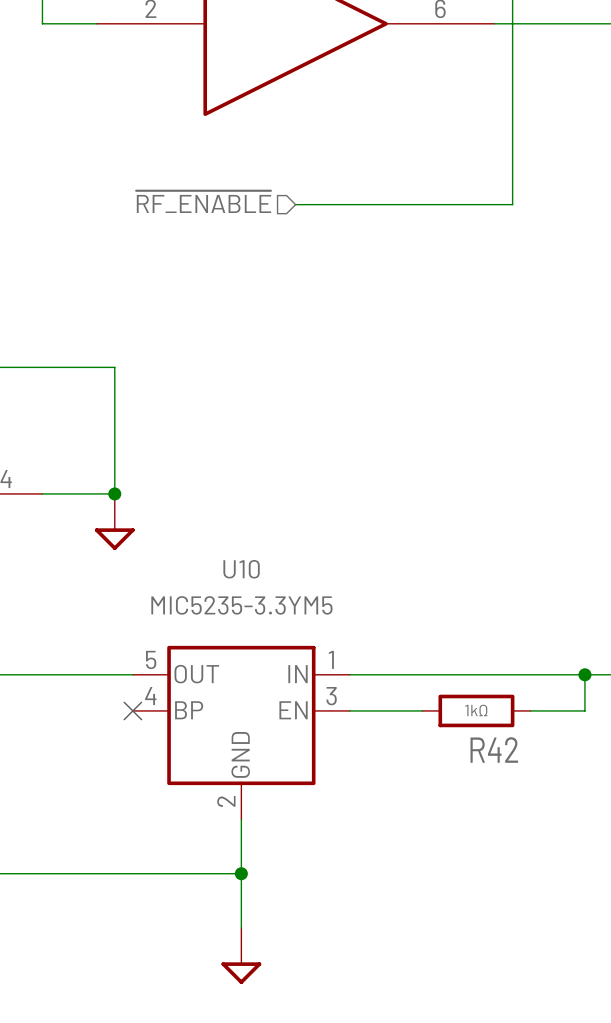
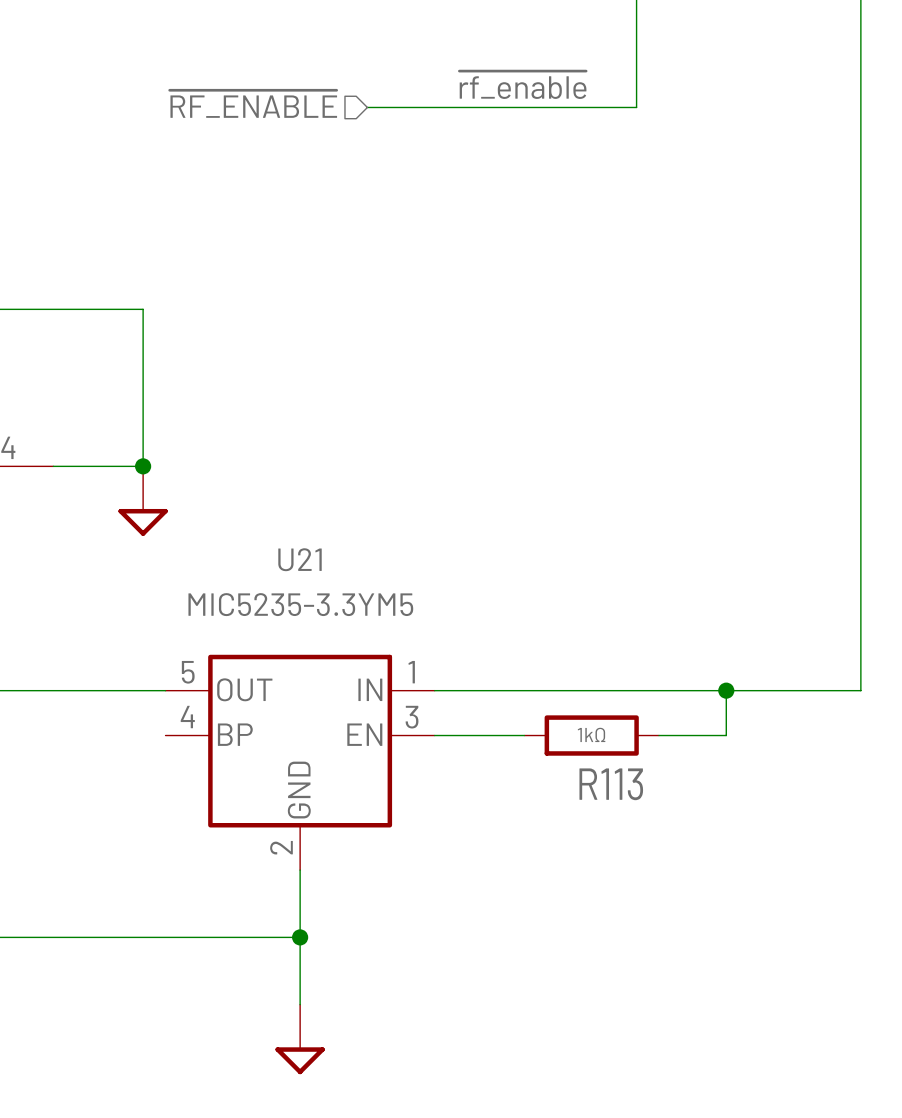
label: none -> ~{rf_enable} (522, 85)
U10 name: U10 (241, 569) -> U21 (300, 559)
no-connect mark: (132, 710) -> none
R42 name: R42 (494, 750) -> R113 (611, 784)

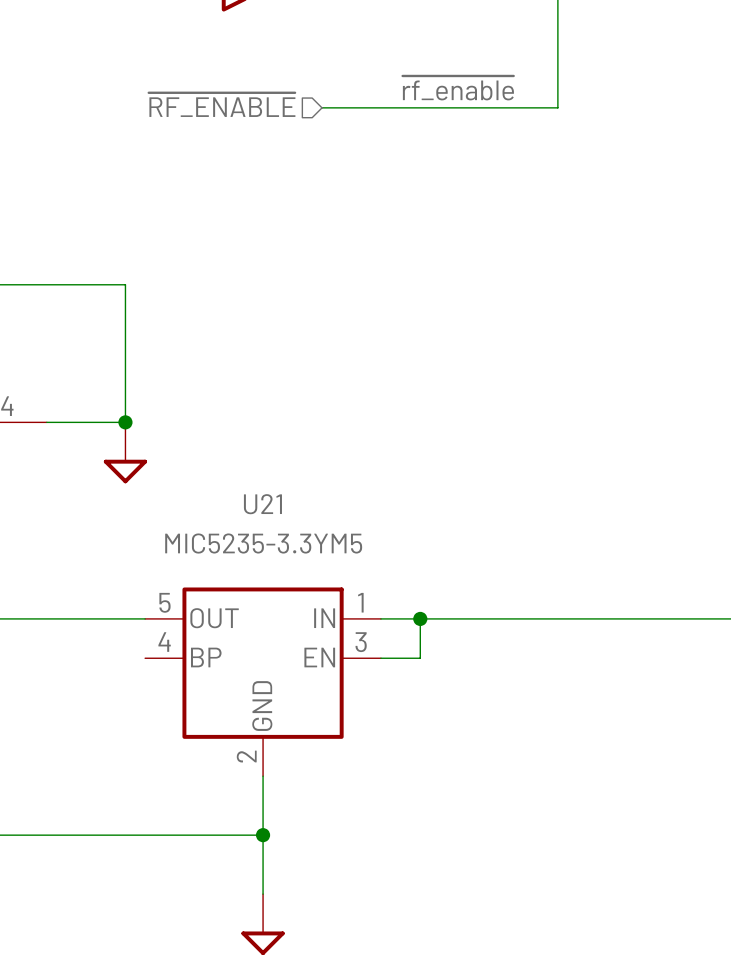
junction: none -> (420, 618)
wire: (726, 690) (726, 735) (659, 735) -> none
junction: (726, 690) -> none
wire: (479, 735) (524, 735) -> (420, 658) (420, 618)
R113: 1kΩ (591, 735) -> none

